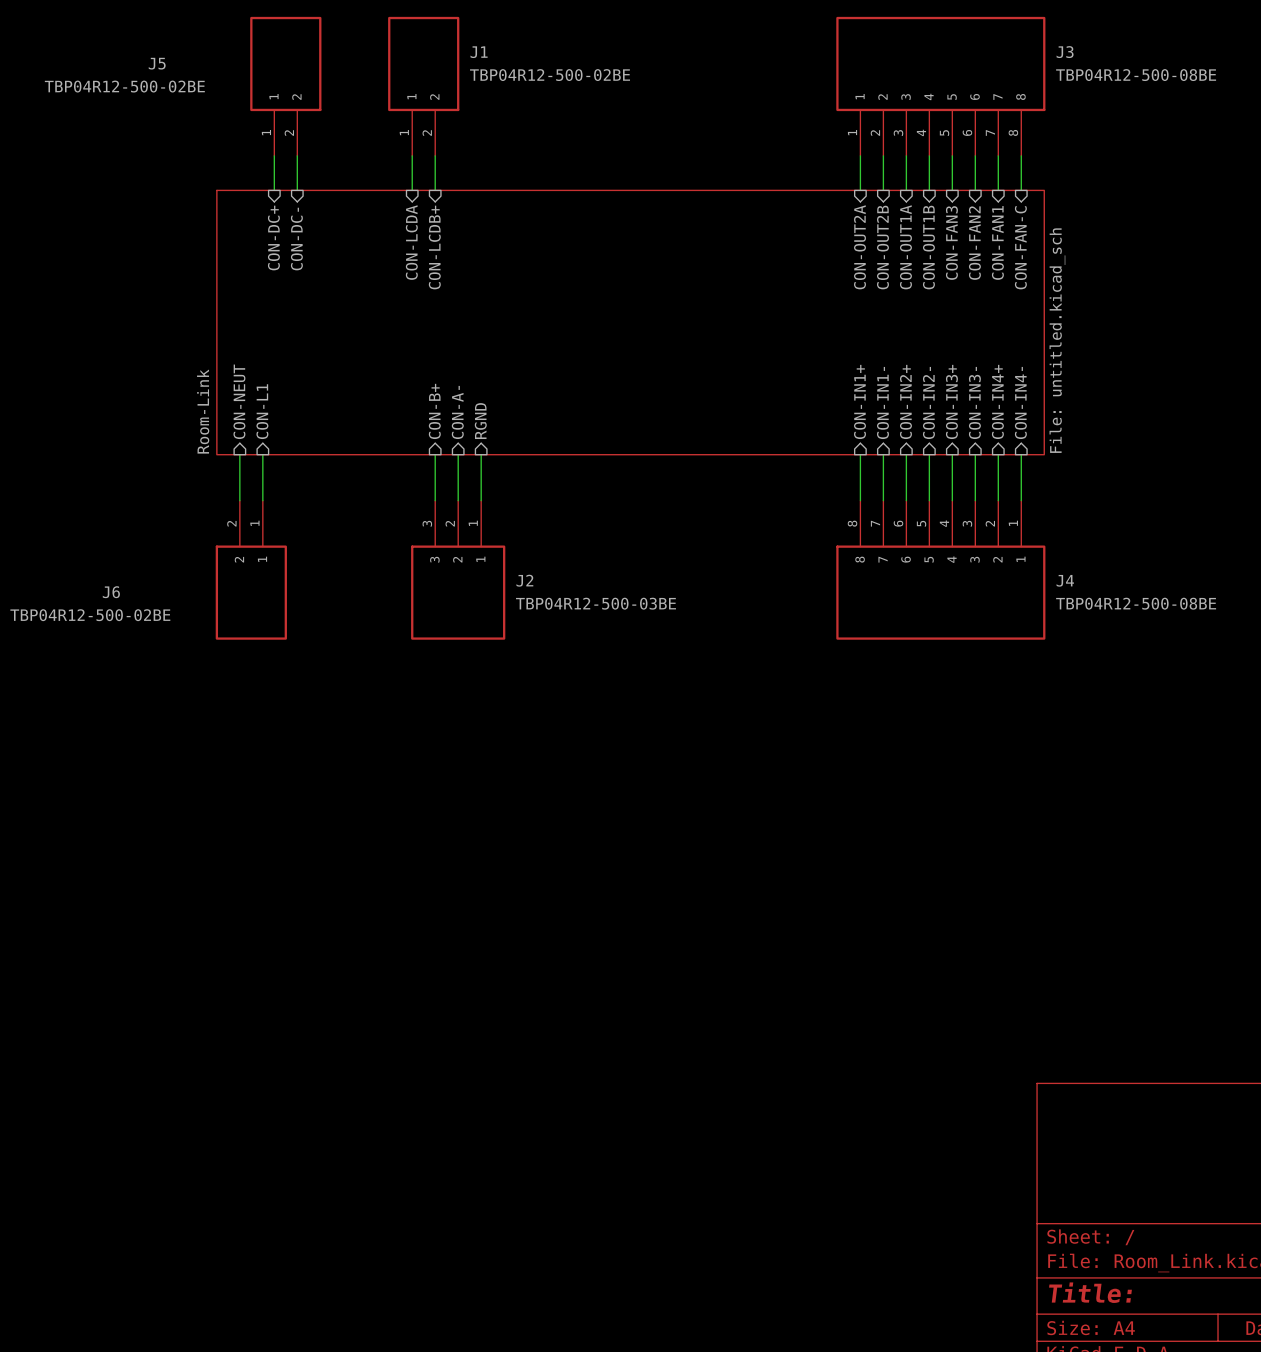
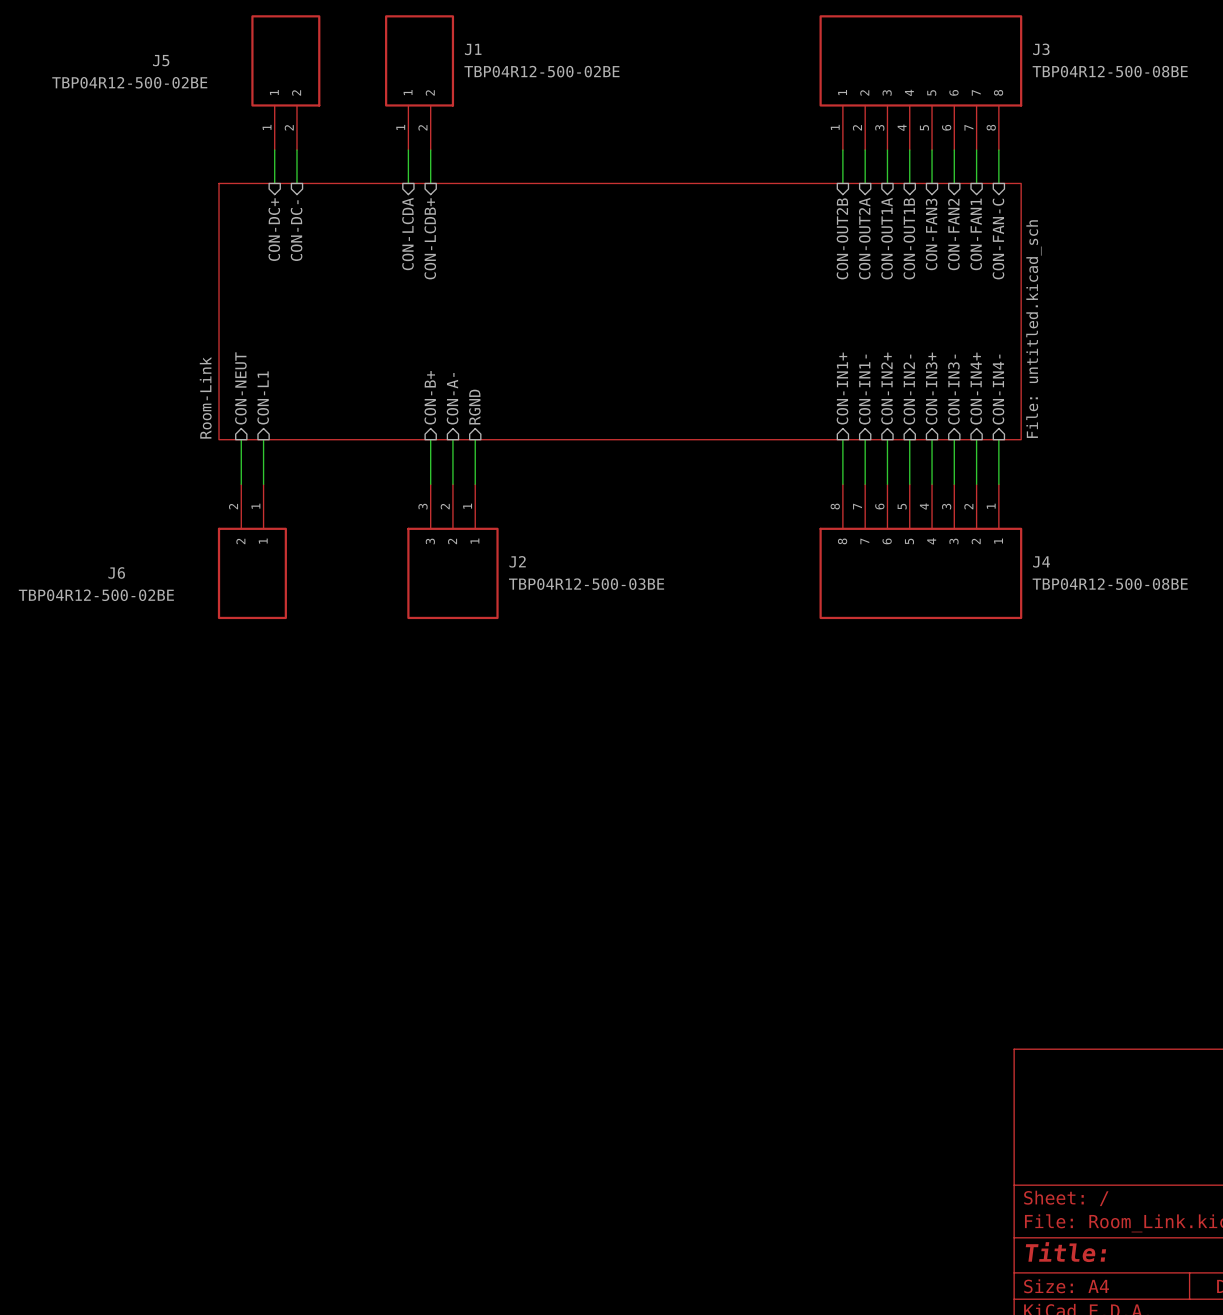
sheet pin: CON-OUT2A (859, 247) -> CON-OUT2B (842, 238)
sheet pin: CON-OUT2B (882, 247) -> CON-OUT2A (864, 238)

